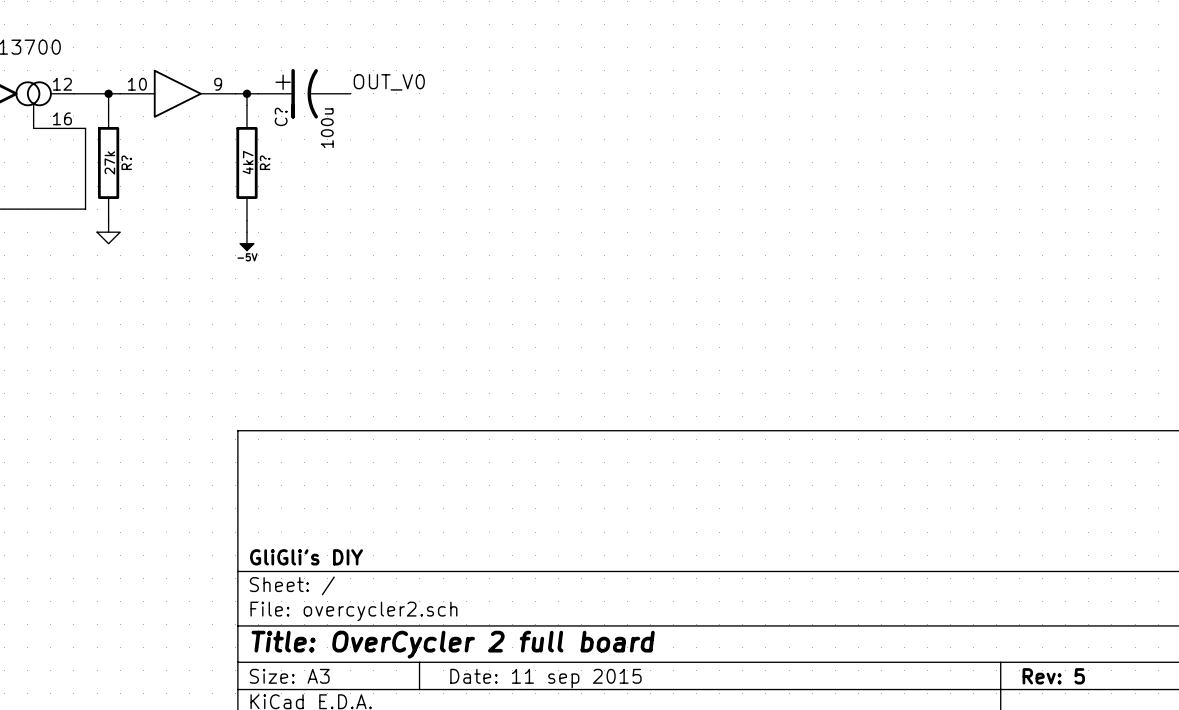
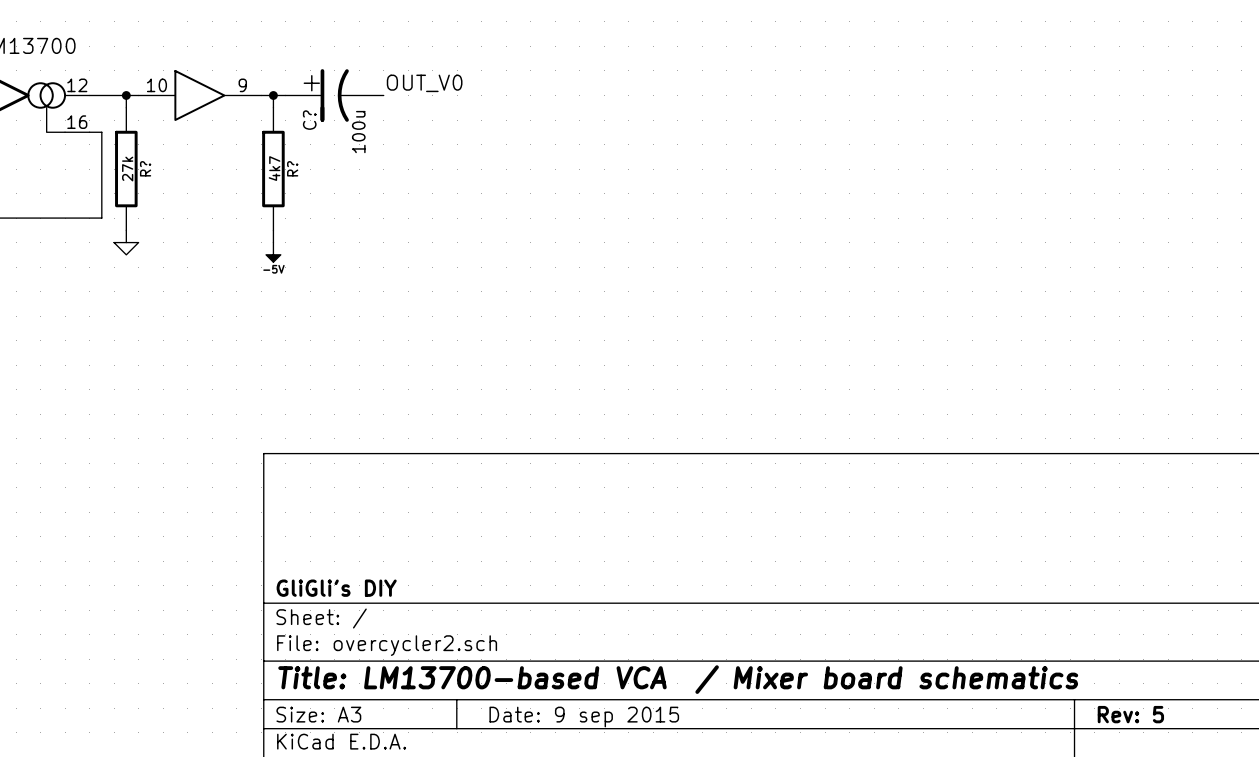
title block: Title: OverCycler 2 full board (453, 644) -> Title: LM13700-based VCA / Mixer board schematics (678, 679)
title block: Date: 11 sep 2015 (545, 678) -> Date: 9 sep 2015 (584, 717)

